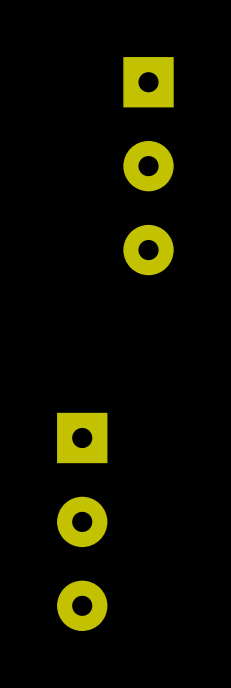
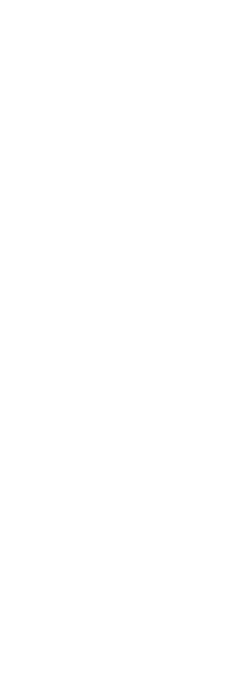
part: (148, 166) -> none
part: (82, 521) -> none

